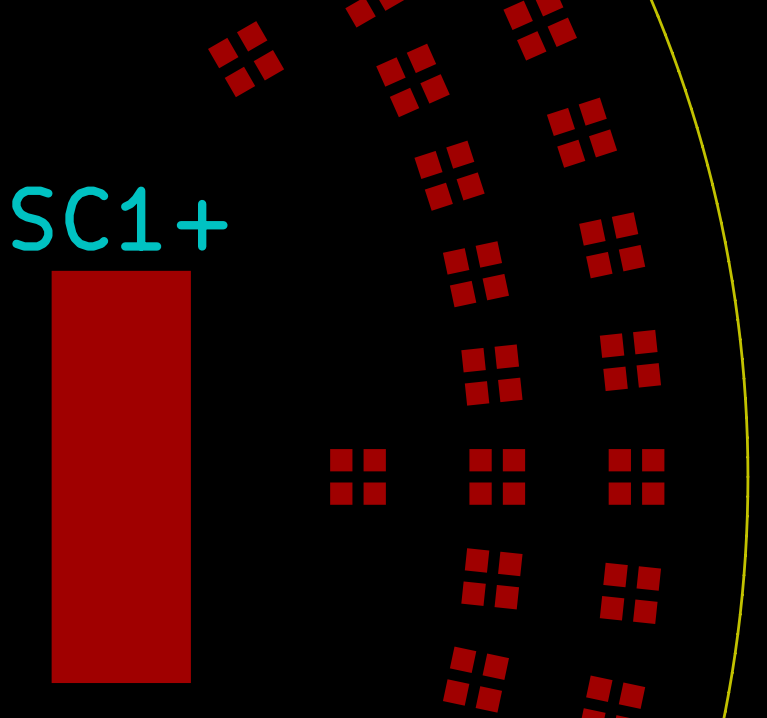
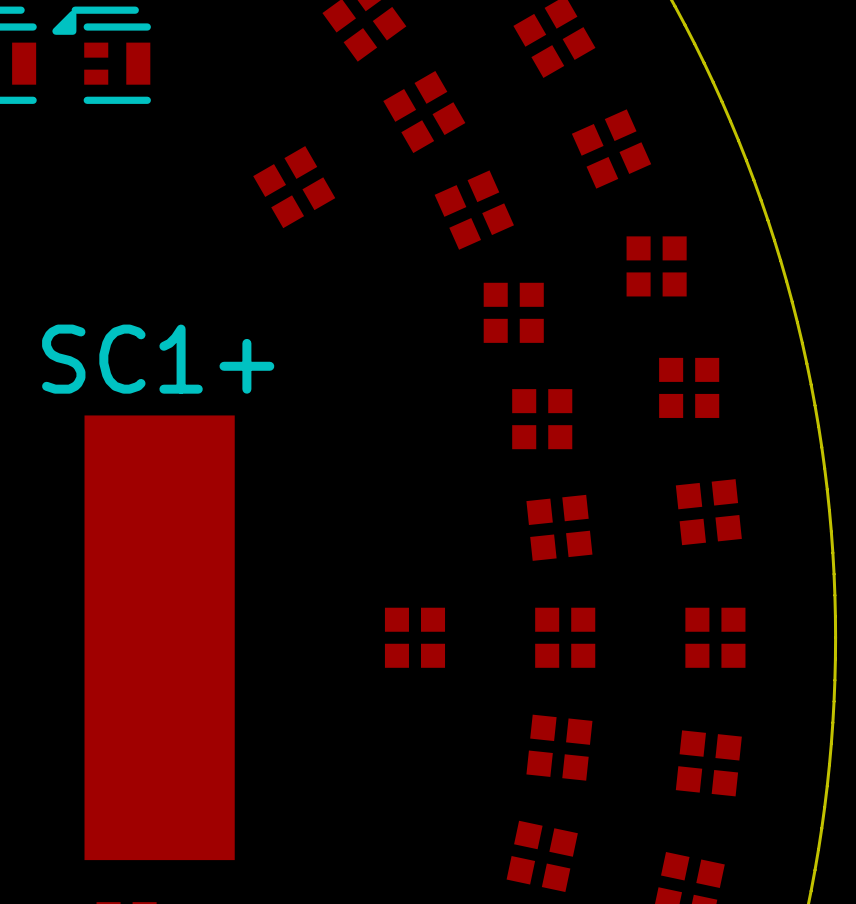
part rotation: 0° (582, 132) -> 18° clockwise (656, 266)
part rotation: 0° (449, 175) -> 18° clockwise (513, 312)
part rotation: 0° (612, 245) -> 12° clockwise (689, 387)
part rotation: 0° (475, 274) -> 12° clockwise (542, 419)

